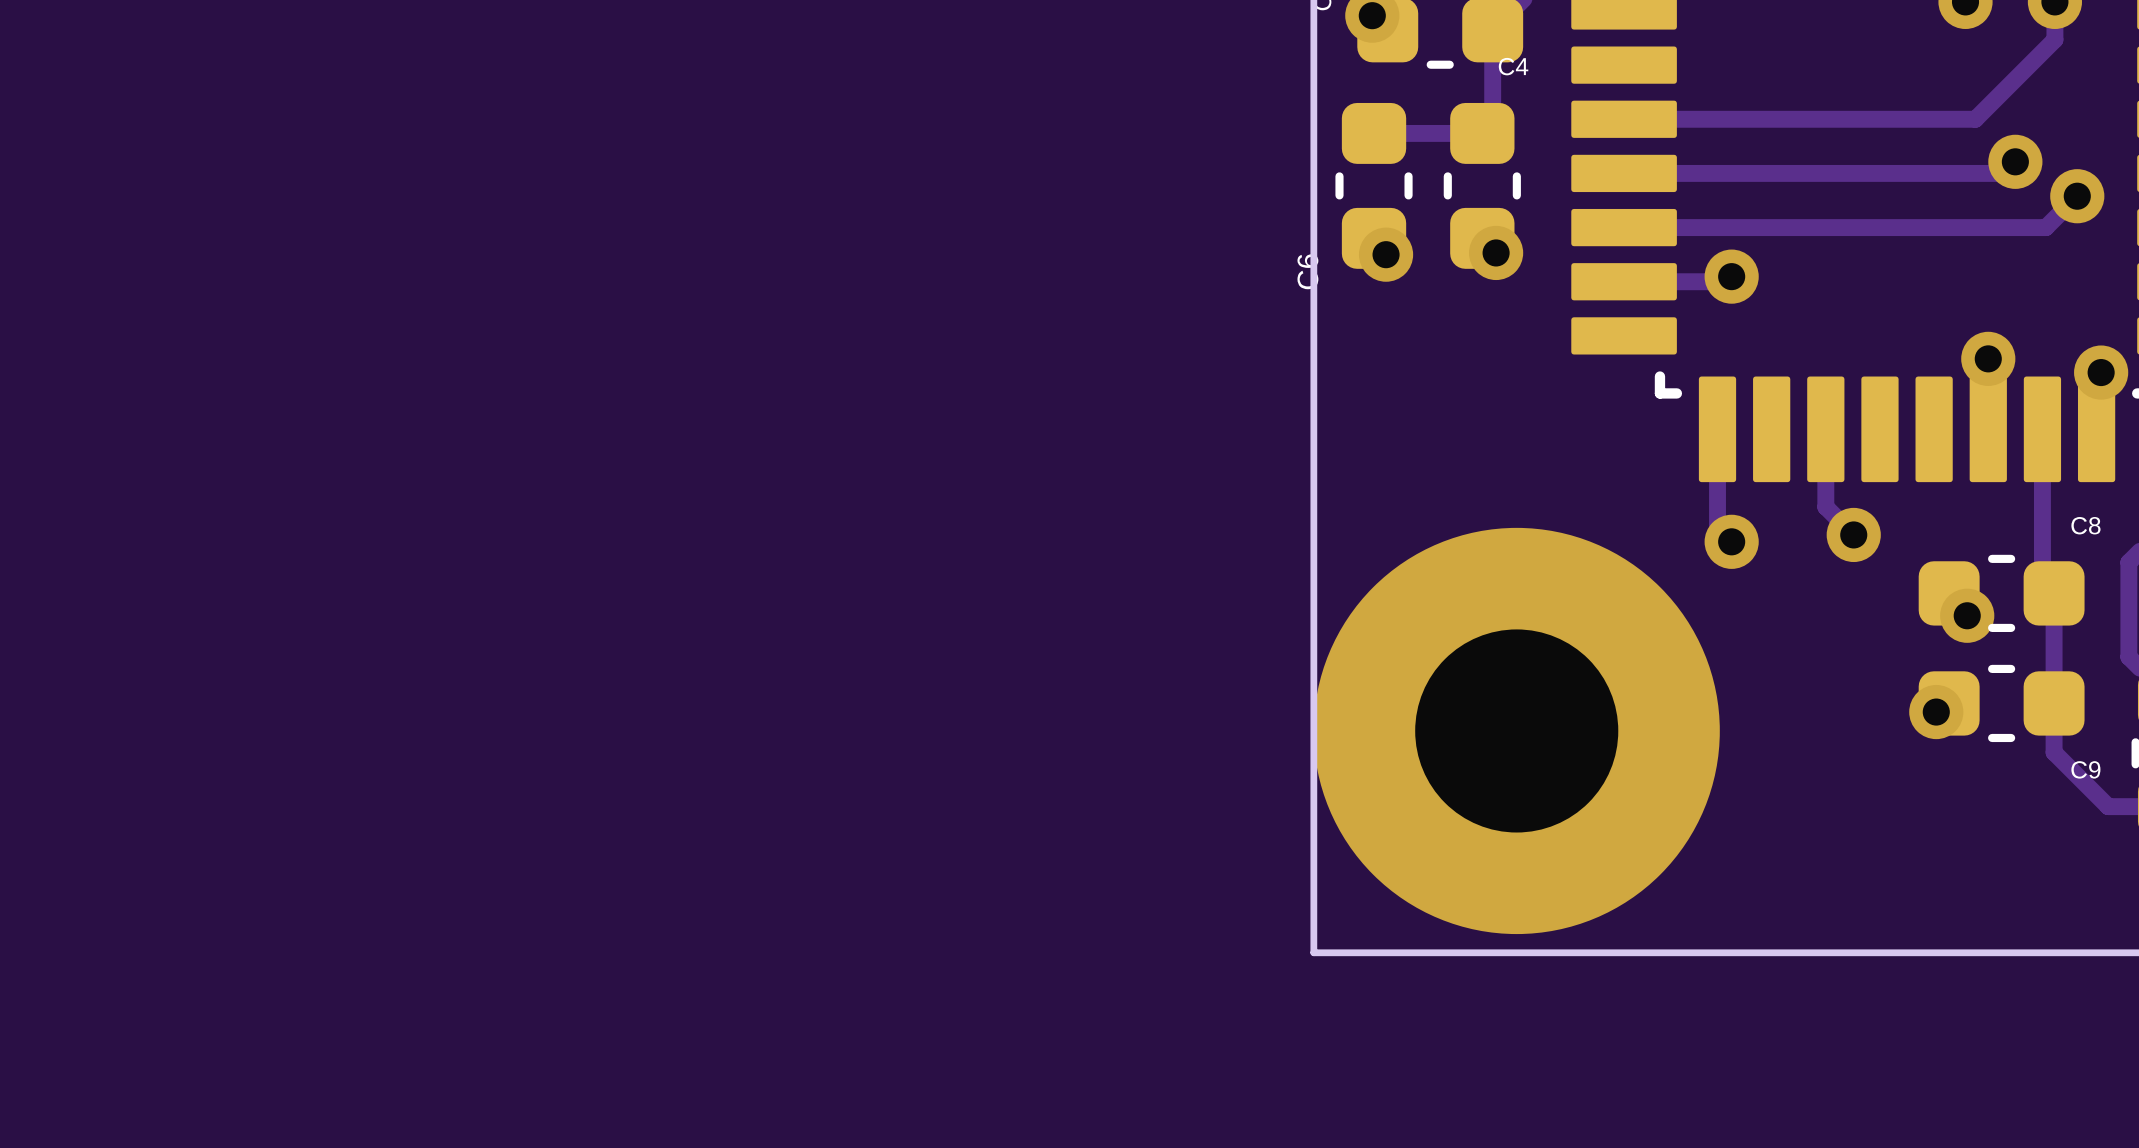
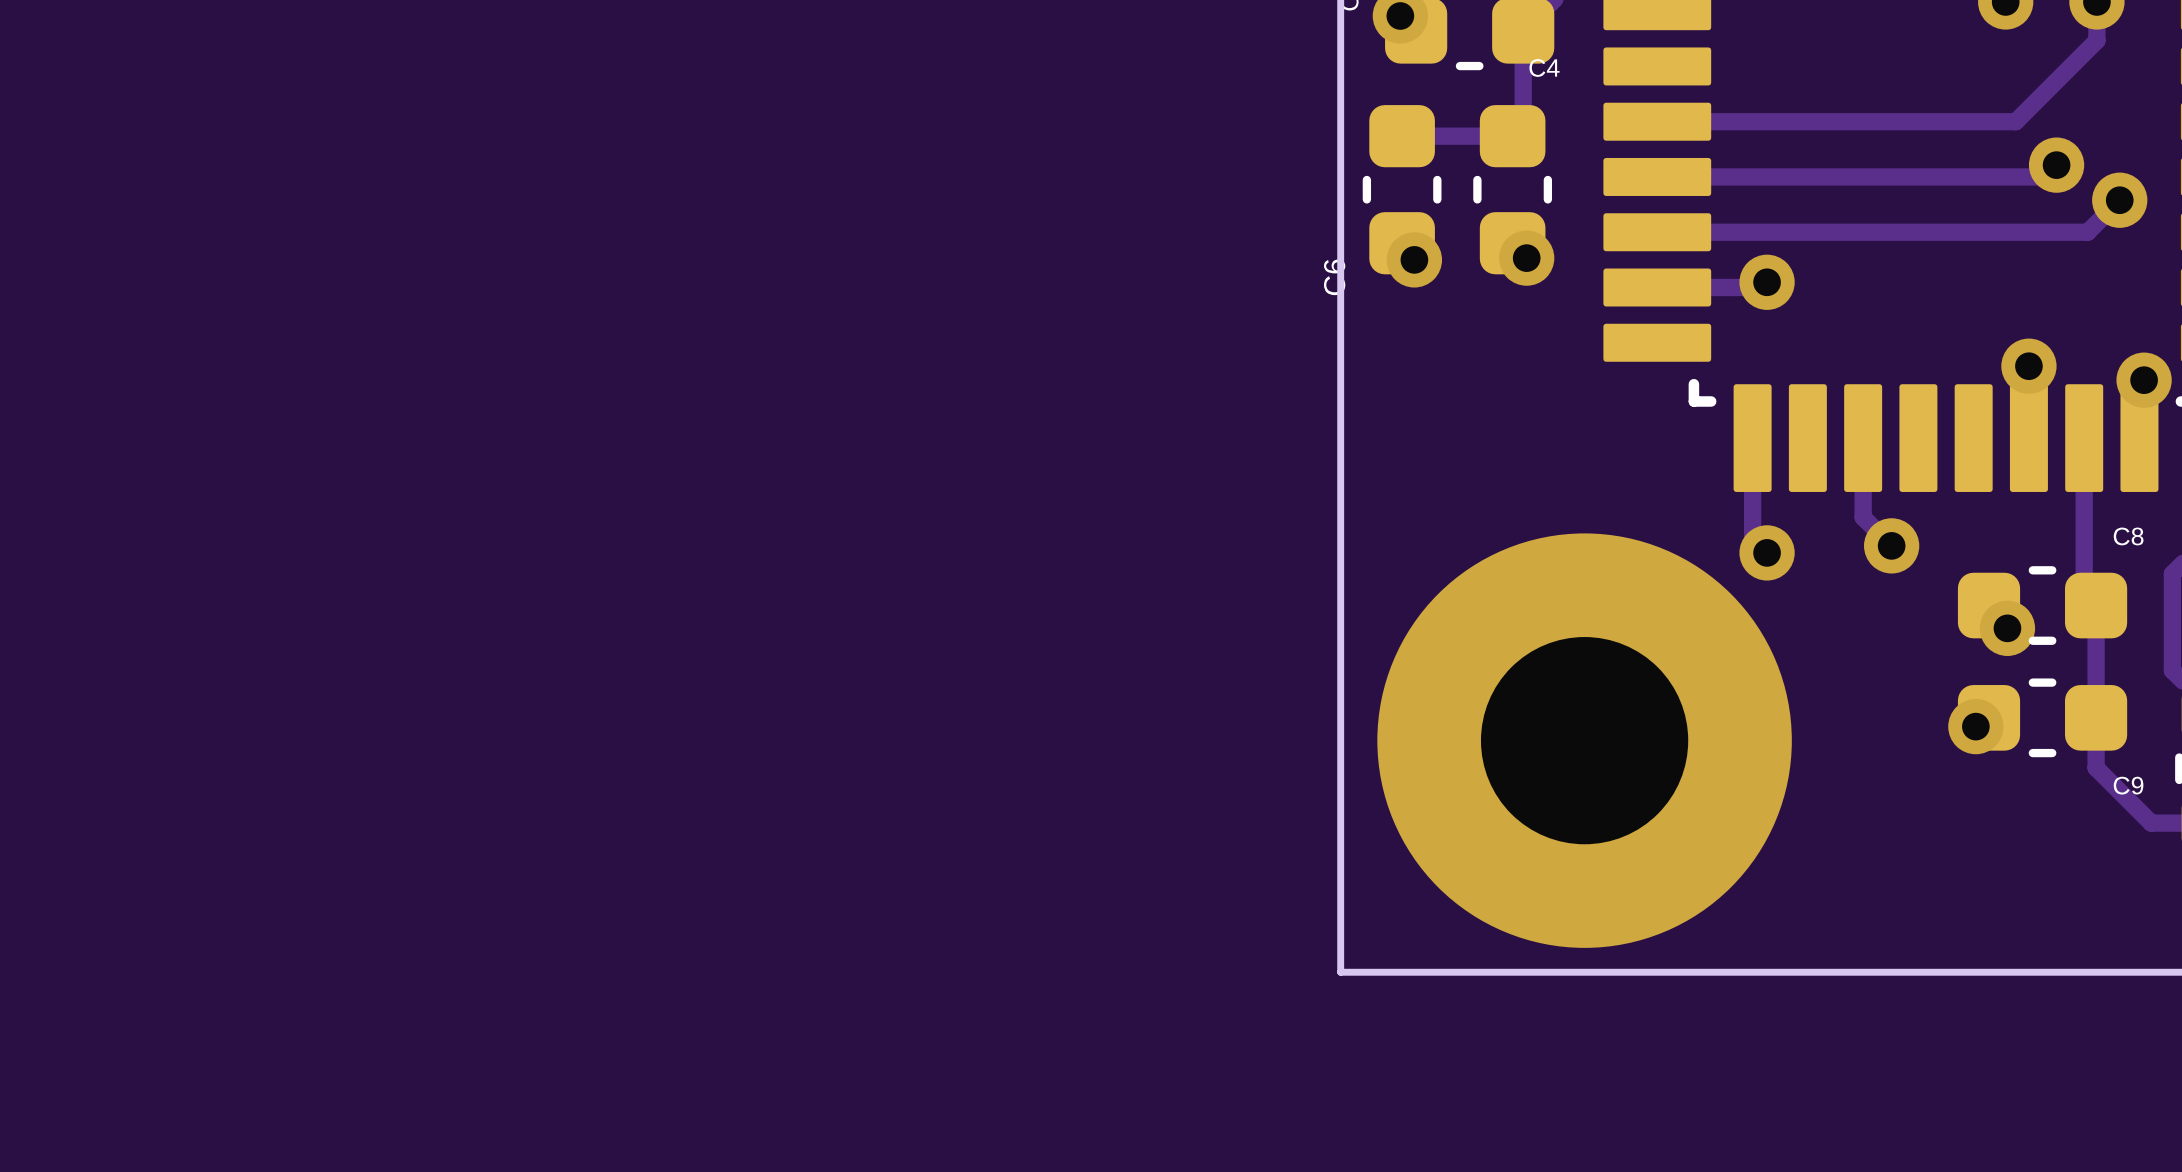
via position: (1516, 730) -> (1584, 740)

